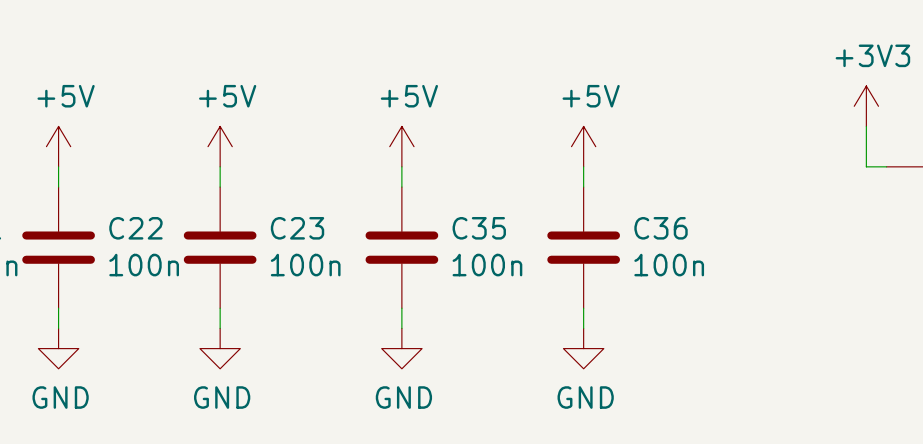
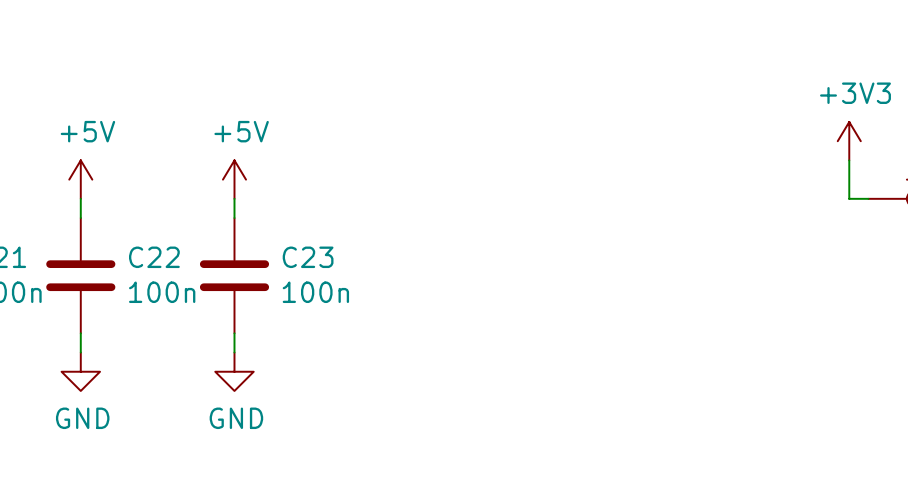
power symbol: +5V (401, 146) -> none
power symbol: +5V (583, 146) -> none
wire: (401, 166) (401, 187) -> none
wire: (583, 166) (583, 187) -> none
C35: 100n (401, 247) -> none
C36: 100n (583, 247) -> none
wire: (401, 308) (401, 328) -> none
wire: (583, 308) (583, 328) -> none
power symbol: GND (401, 348) -> none
power symbol: GND (583, 348) -> none

